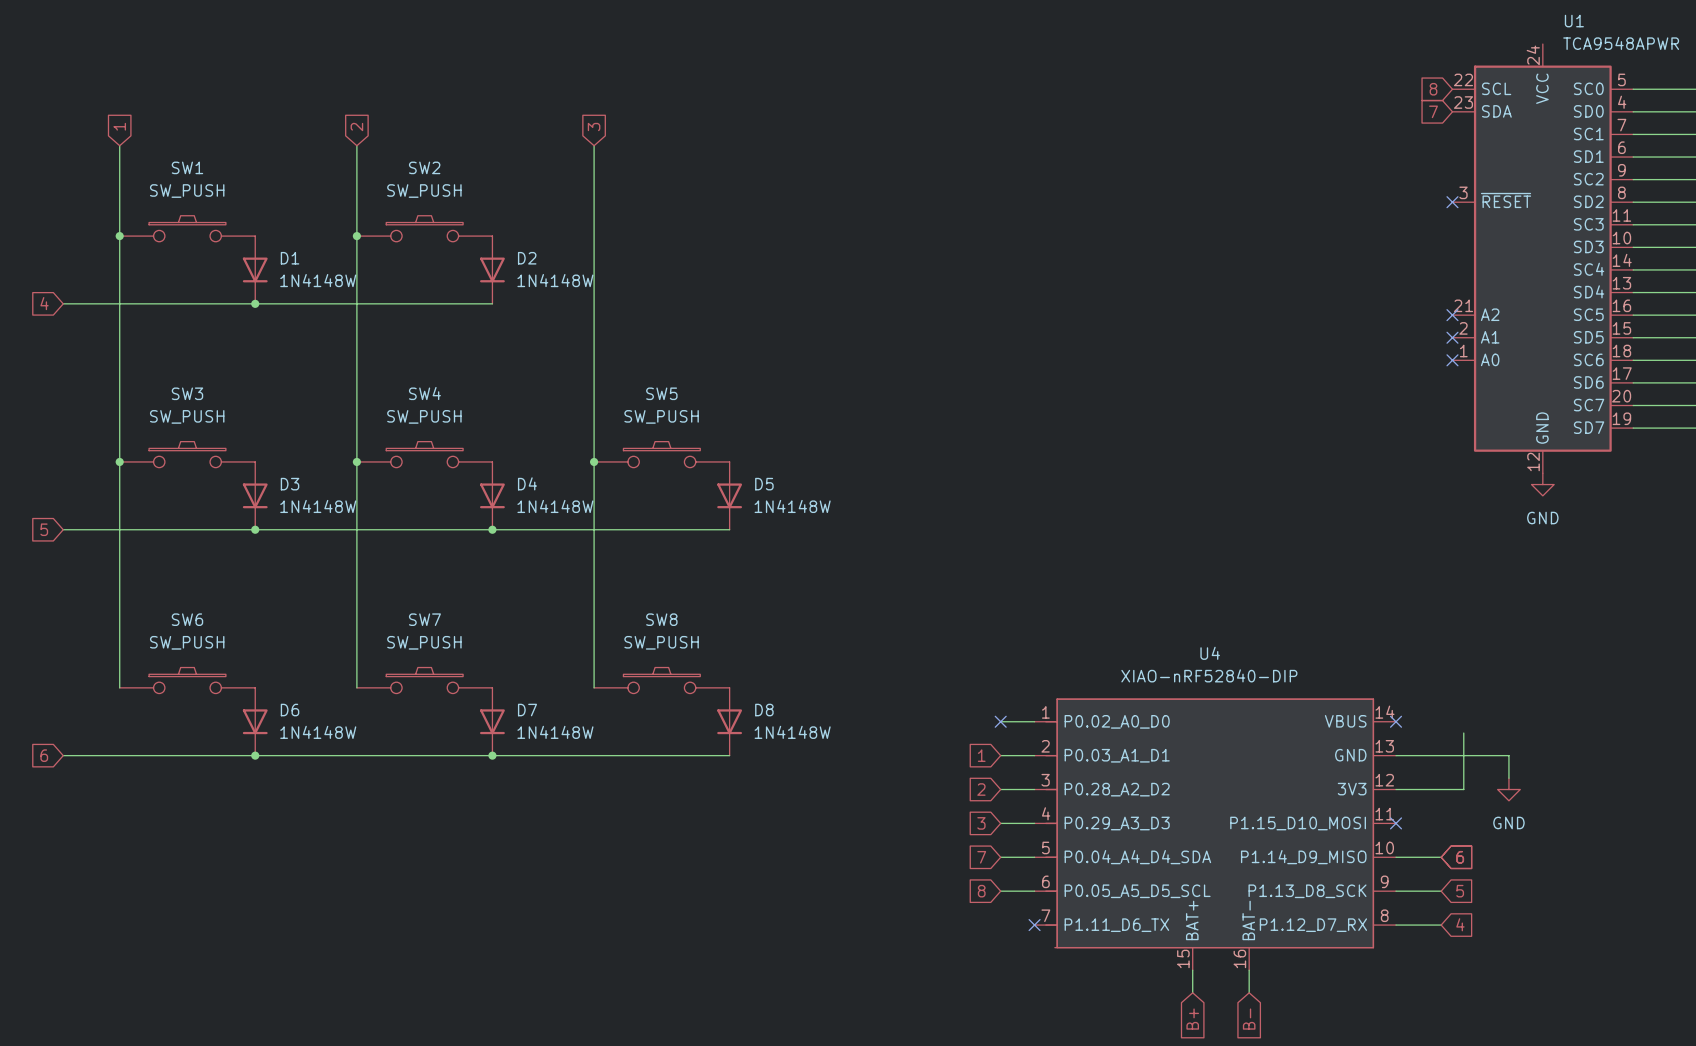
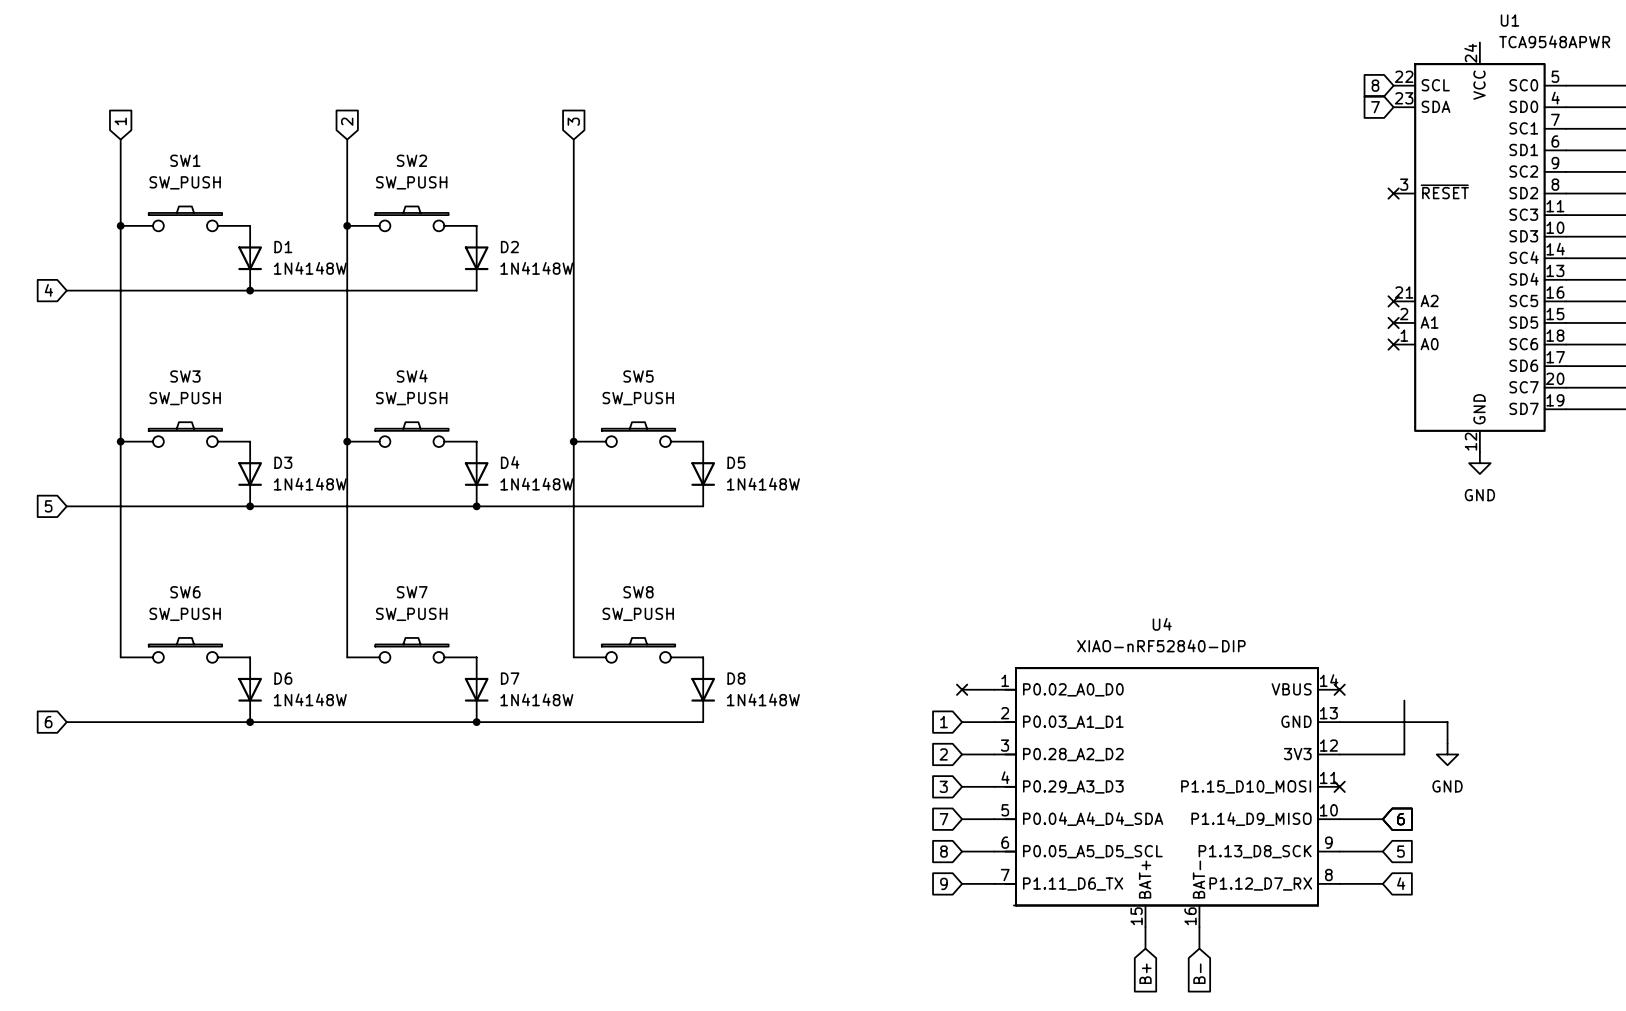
global label: none -> 9 (943, 883)
wire: none -> (962, 883) (994, 883)
no-connect mark: (1034, 925) -> none

